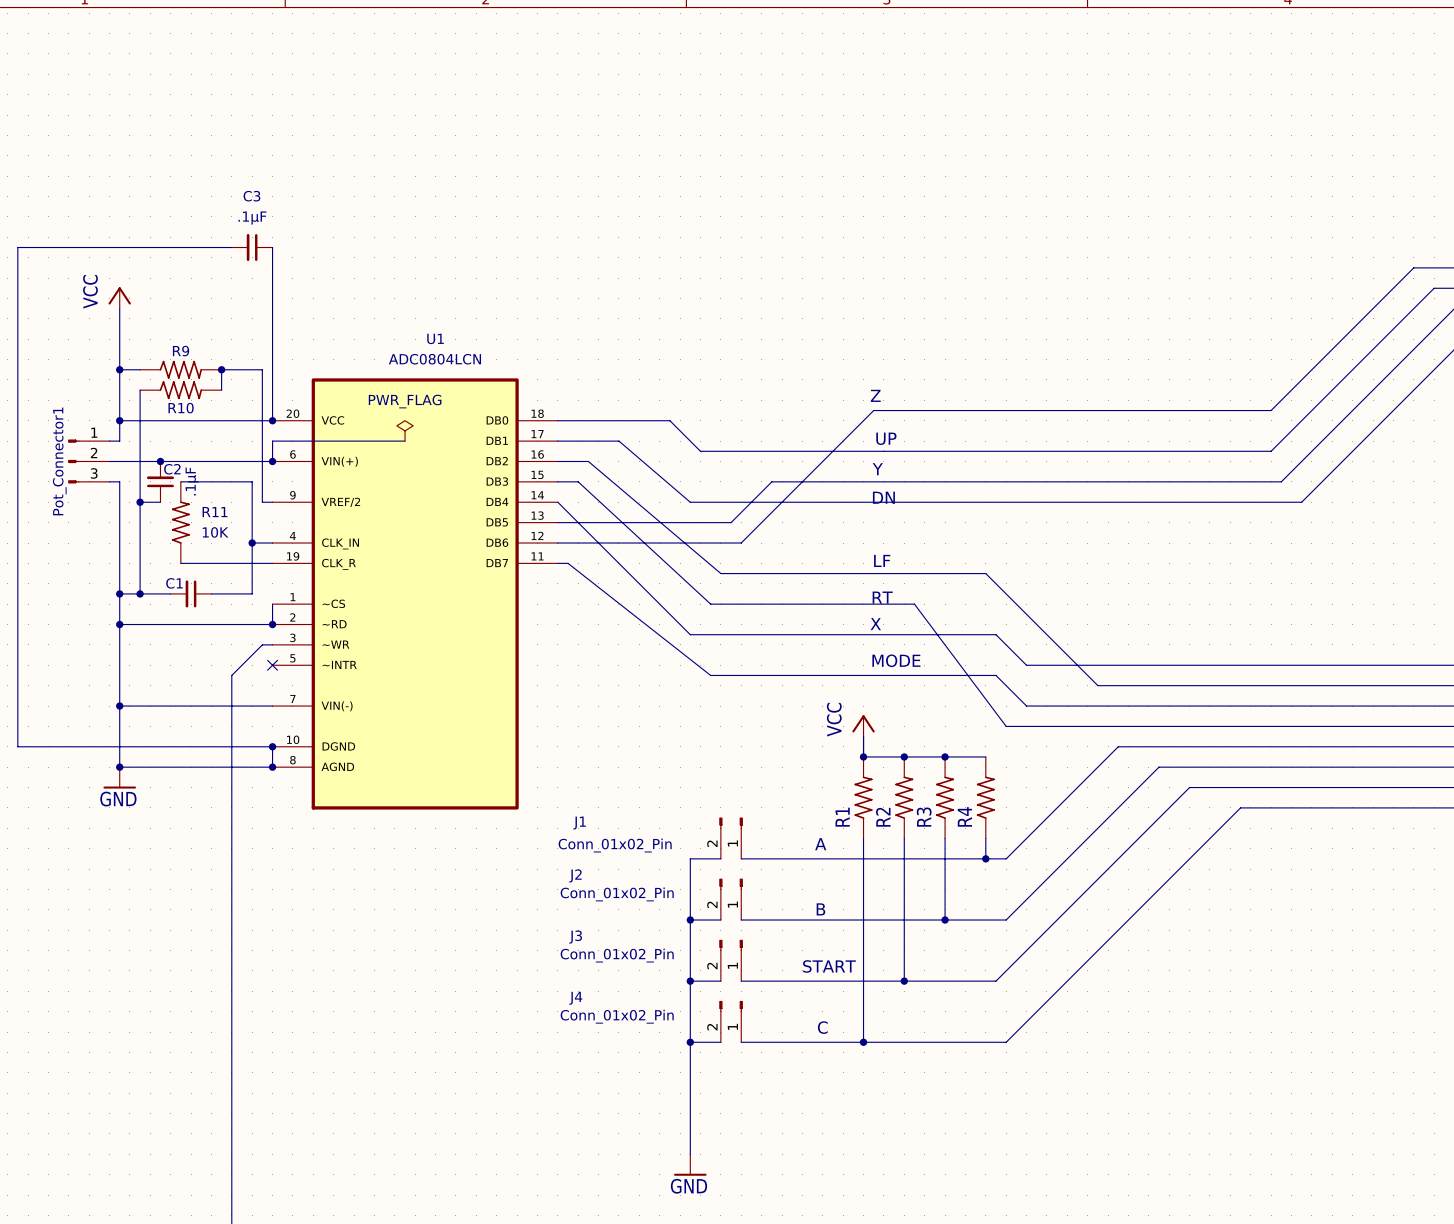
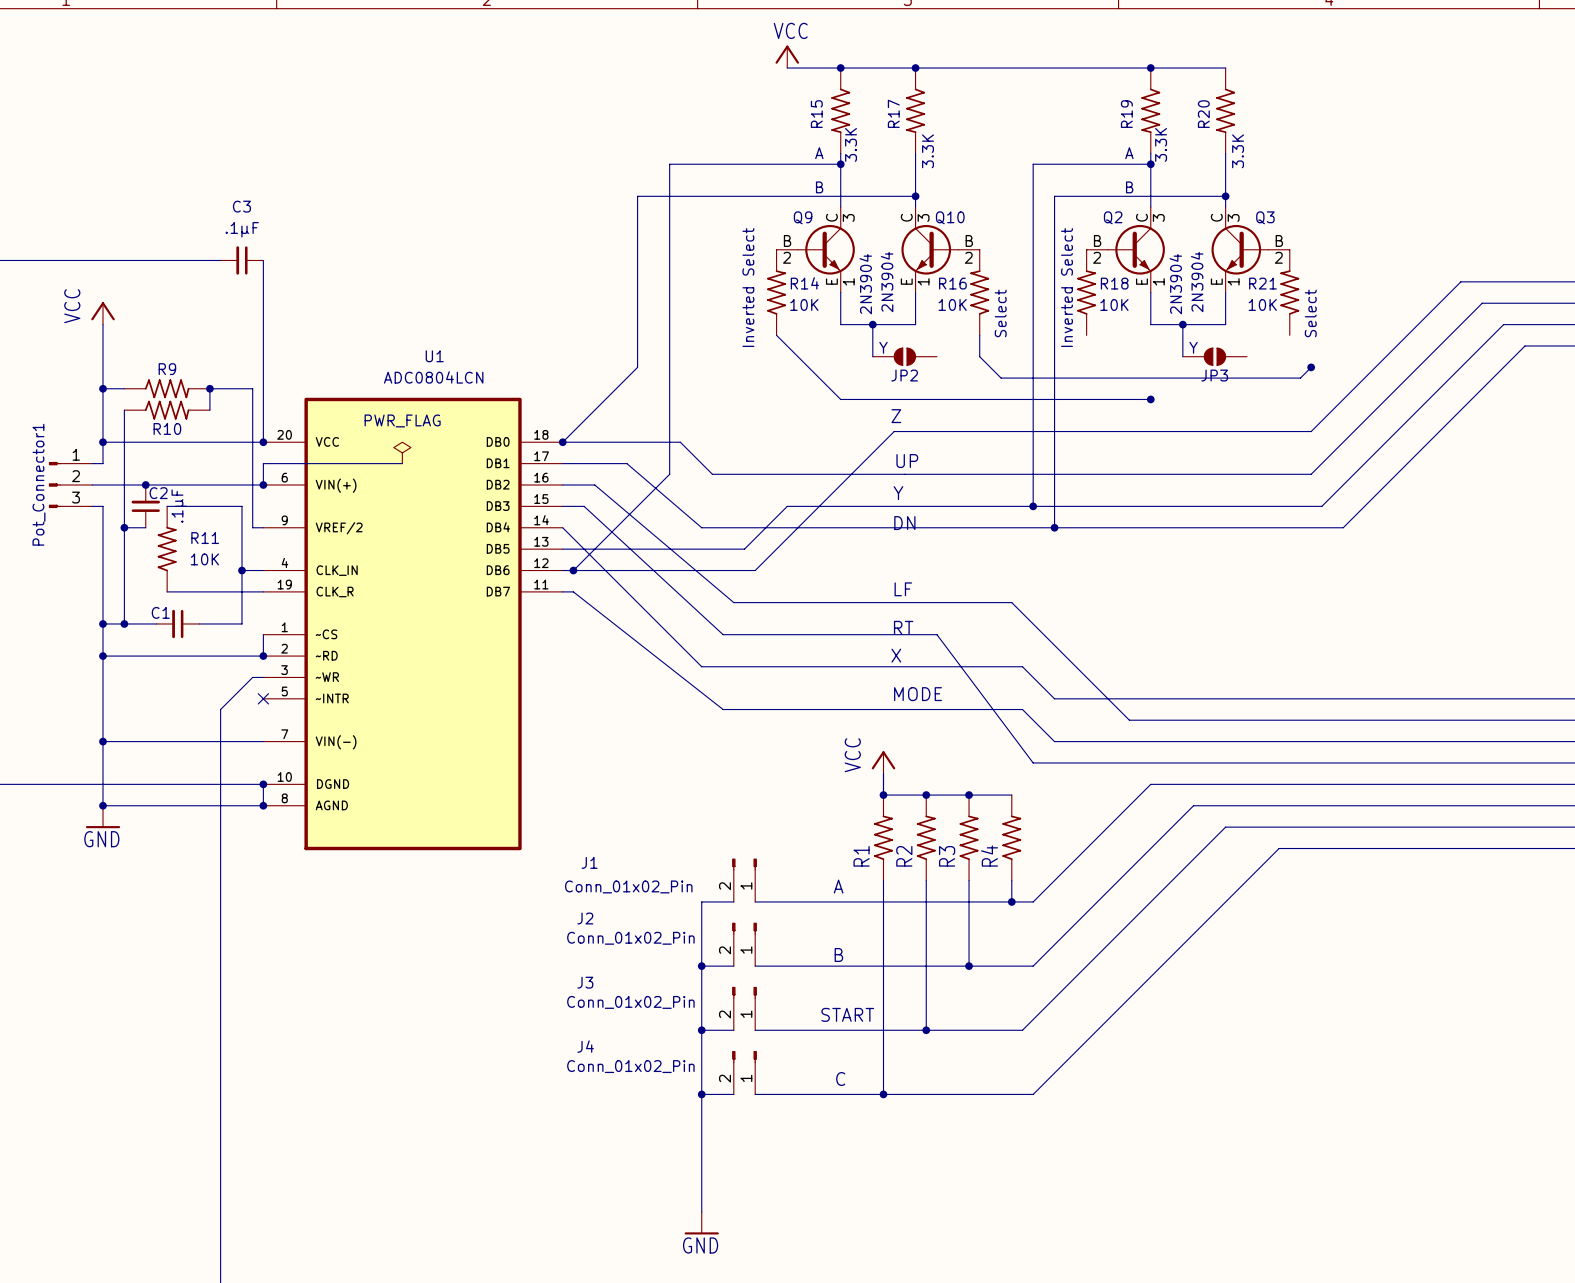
power symbol: none -> VCC (787, 56)
wire: none -> (787, 68) (1225, 68)
junction: none -> (840, 68)
junction: none -> (915, 68)
junction: none -> (1150, 68)
R15: none -> 3.3K (840, 110)
R17: none -> 3.3K (915, 110)
R19: none -> 3.3K (1150, 110)
R20: none -> 3.3K (1225, 110)
text: none -> A (819, 153)
wire: none -> (840, 153) (840, 207)
wire: none -> (915, 153) (915, 207)
text: none -> A (1129, 153)
wire: none -> (1150, 153) (1150, 207)
wire: none -> (1225, 153) (1225, 207)
wire: none -> (840, 164) (669, 164) (669, 474) (573, 570)
junction: none -> (840, 164)
wire: none -> (1150, 164) (1033, 164) (1033, 506)
junction: none -> (1150, 164)
text: none -> B (819, 187)
text: none -> B (1129, 187)
wire: none -> (915, 196) (637, 196) (637, 367) (562, 442)
junction: none -> (915, 196)
wire: none -> (1225, 196) (1054, 196) (1054, 527)
junction: none -> (1225, 196)
Q9: none -> 2N3904 (815, 249)
Q10: none -> 2N3904 (940, 249)
Q2: none -> 2N3904 (1125, 249)
Q3: none -> 2N3904 (1250, 249)
text: none -> Inverted Select (748, 287)
text: none -> Inverted Select (1066, 287)
R14: none -> 10K (776, 292)
wire: none -> (840, 292) (840, 324) (915, 324) (915, 292)
R16: none -> 10K (979, 292)
R18: none -> 10K (1086, 292)
wire: none -> (1150, 292) (1150, 324) (1225, 324) (1225, 292)
R21: none -> 10K (1289, 292)
text: none -> Select (1000, 313)
text: none -> Select (1310, 313)
wire: none -> (872, 324) (872, 356)
junction: none -> (872, 324)
wire: none -> (1182, 324) (1182, 356)
junction: none -> (1182, 324)
wire: none -> (776, 335) (840, 399) (1150, 399)
wire: none -> (979, 335) (979, 356) (1001, 378) (1300, 378) (1311, 367)
text: none -> Y (883, 347)
text: none -> Y (1193, 347)
JP2: none -> (904, 356)
JP3: none -> (1214, 356)
junction: none -> (1311, 367)
junction: none -> (1150, 399)
junction: none -> (562, 442)
junction: none -> (1033, 506)
junction: none -> (1054, 527)
junction: none -> (573, 570)

